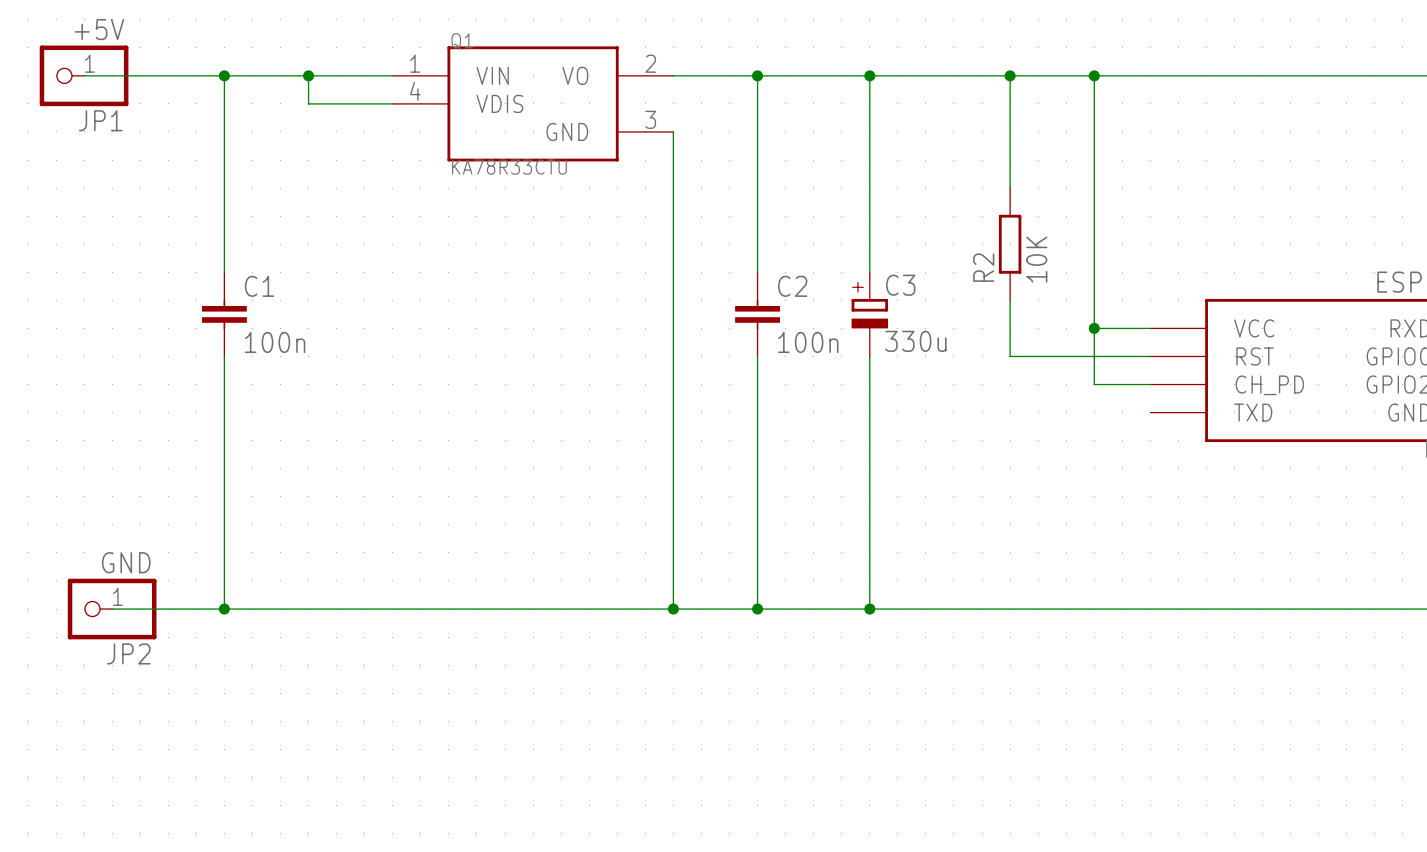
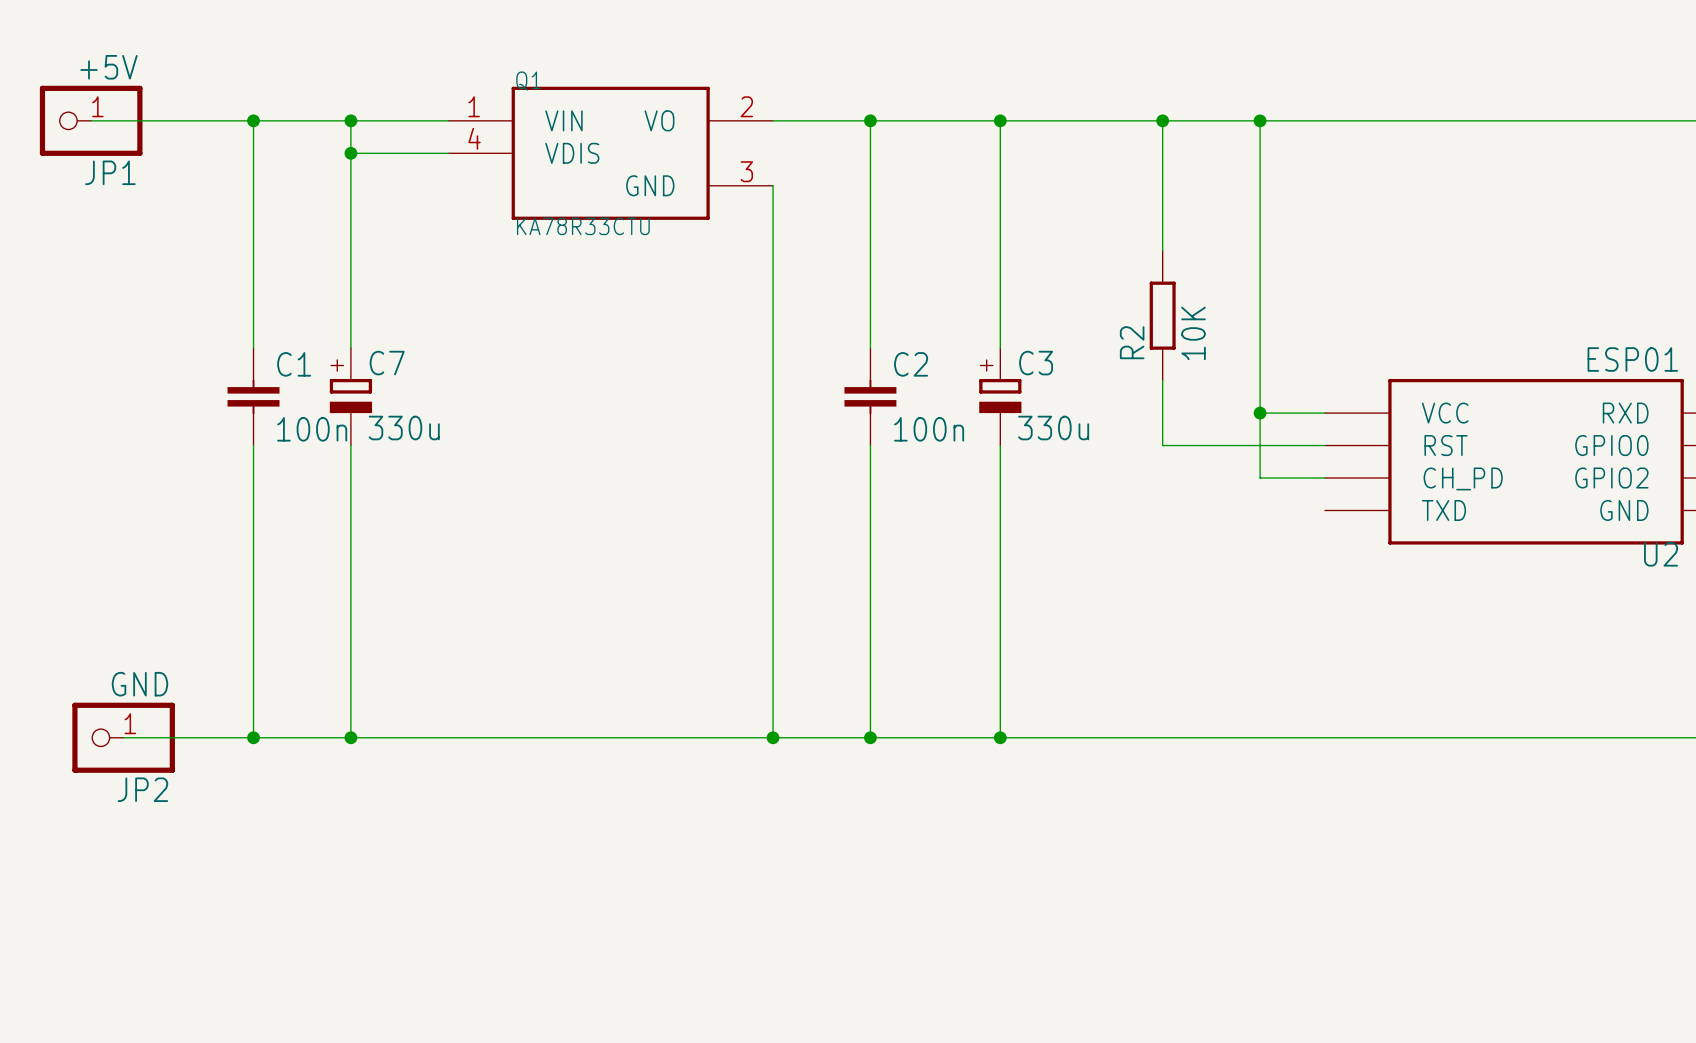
wire: none -> (350, 153) (350, 348)
junction: none -> (350, 153)
C7: none -> 330u (350, 396)
wire: none -> (350, 445) (350, 737)
junction: none -> (350, 737)

